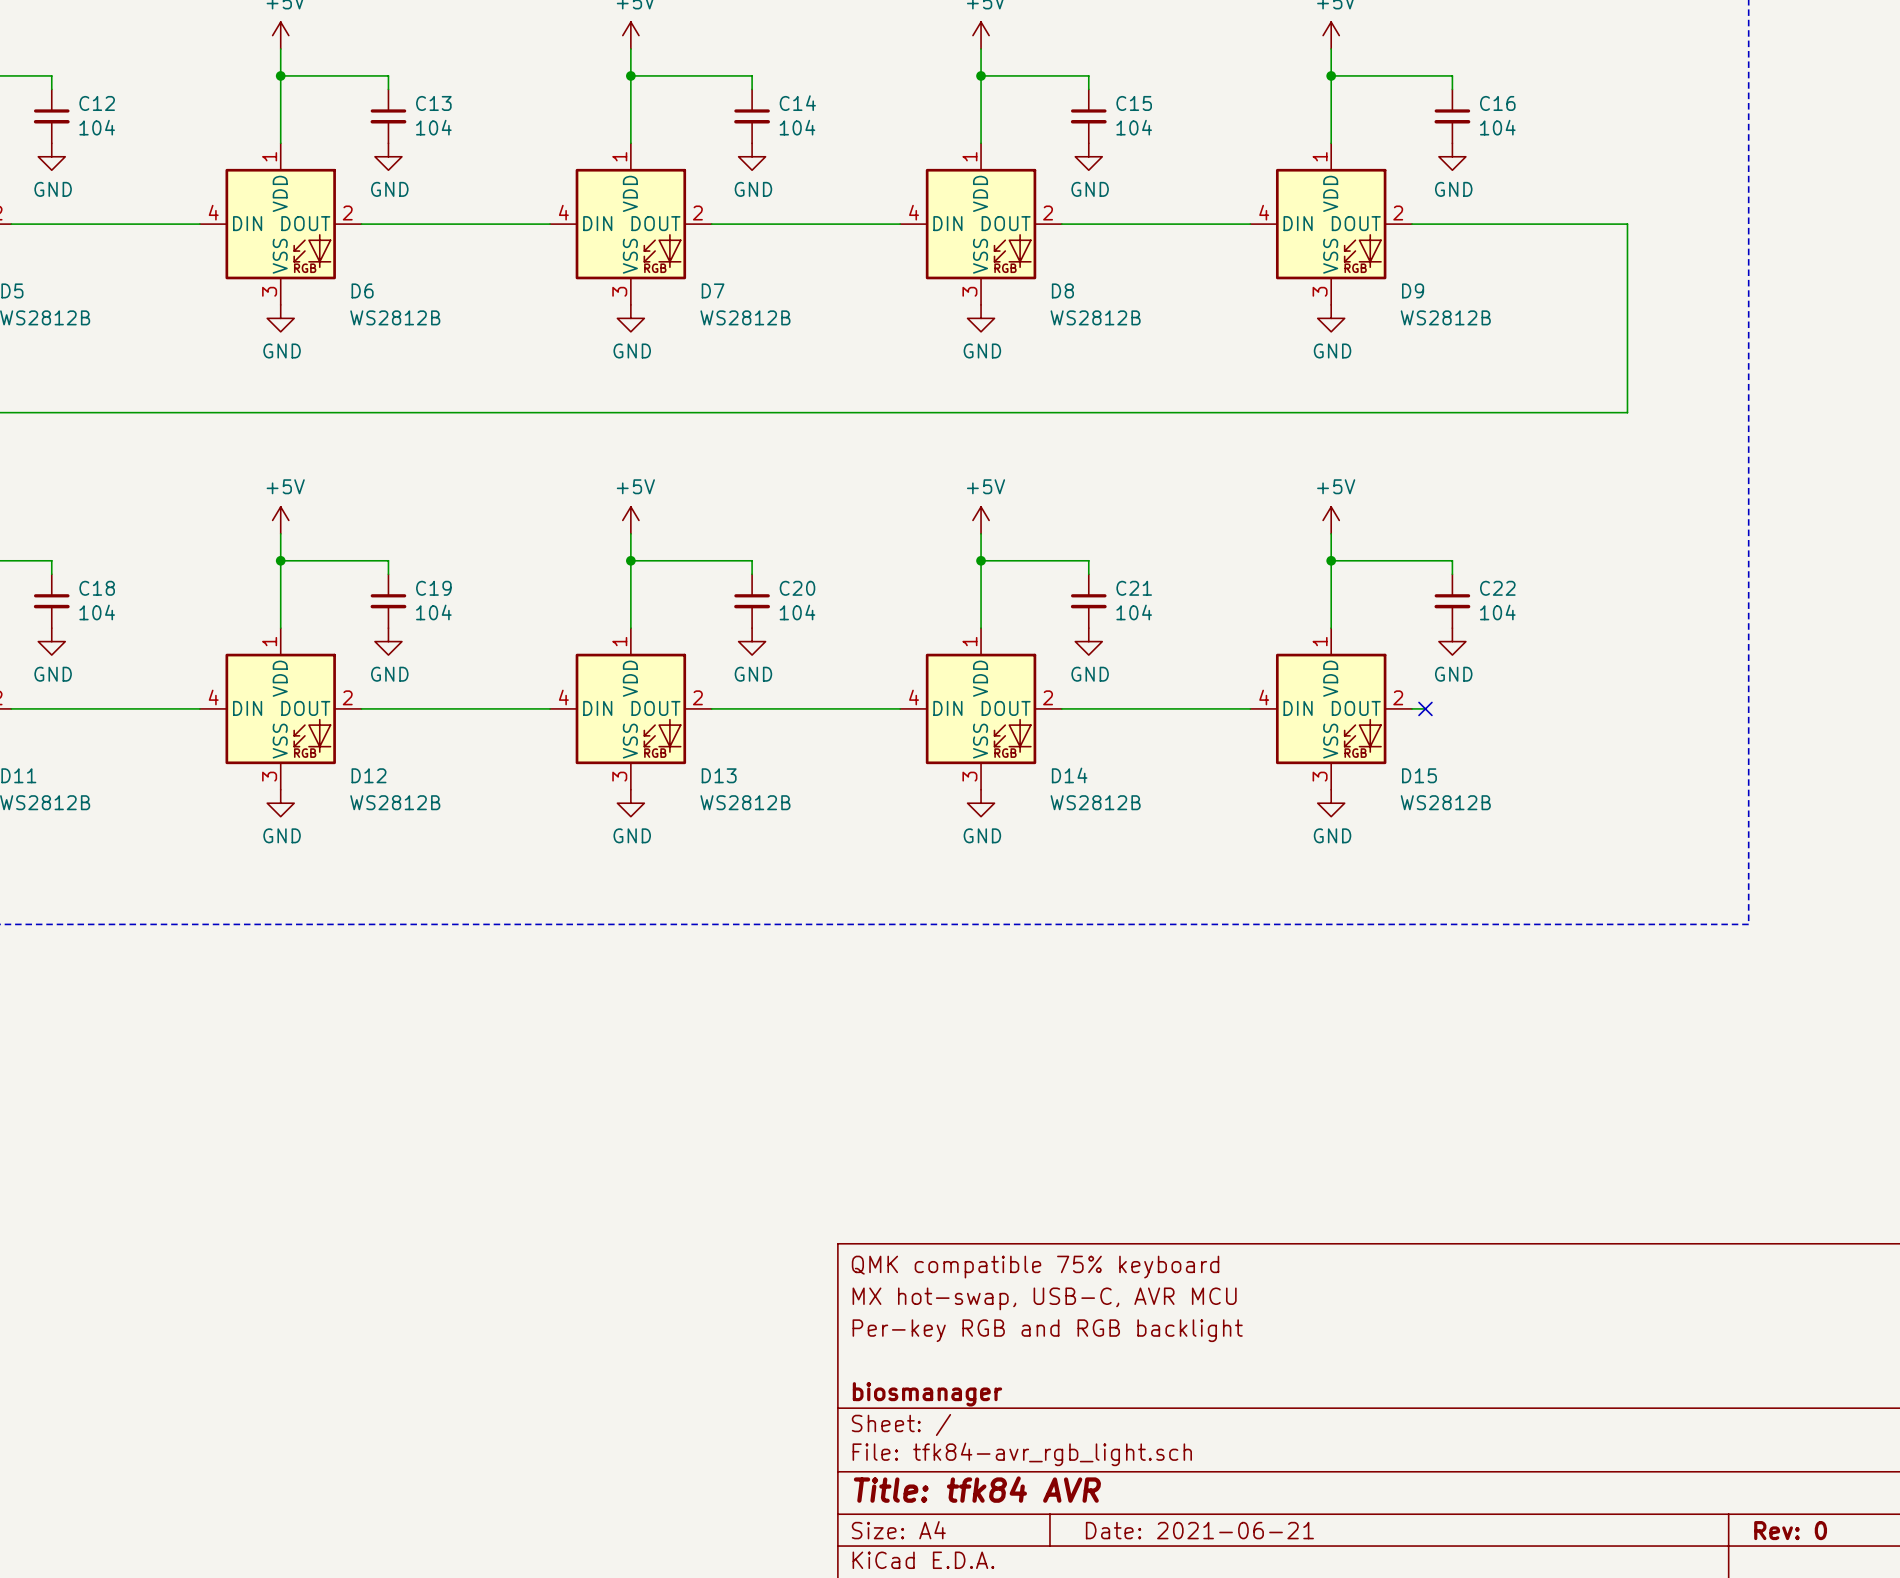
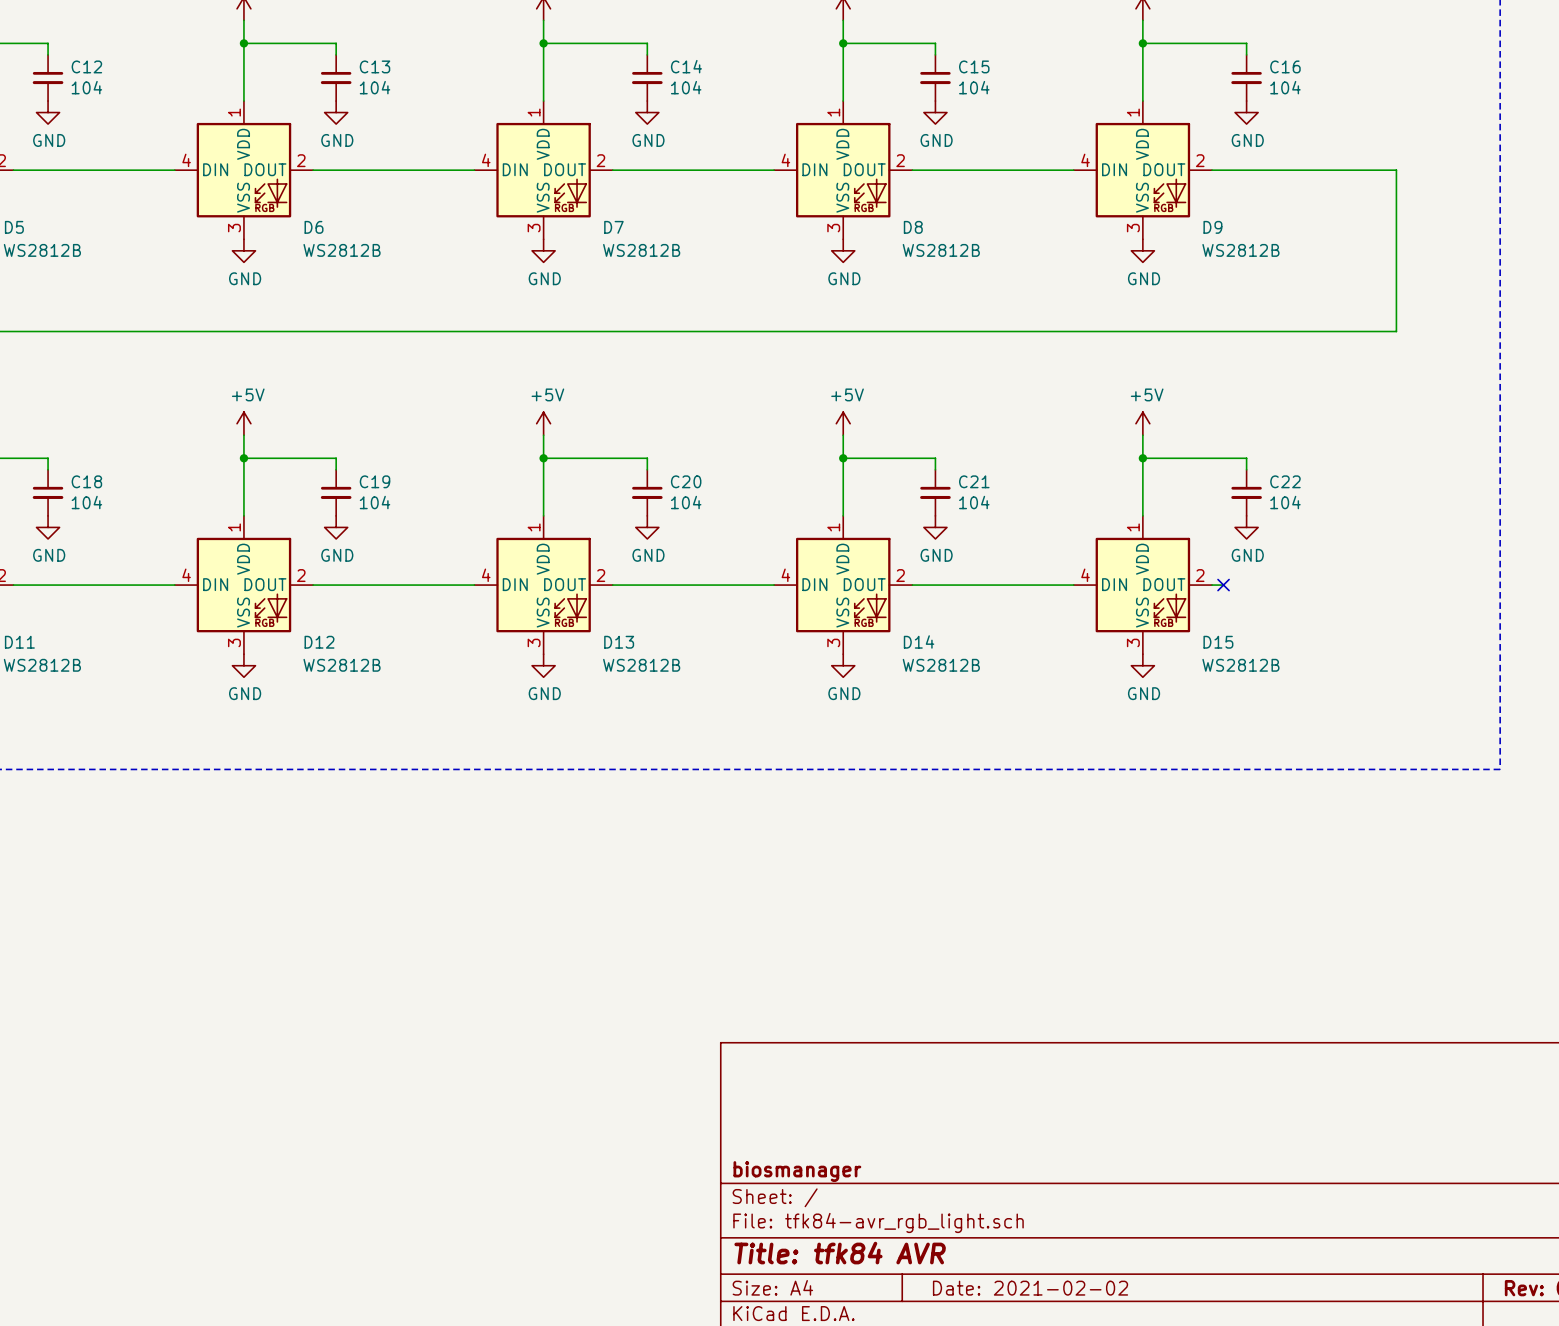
title block: QMK compatible 75% keyboard (1035, 1267) -> none
title block: MX hot-swap, USB-C, AVR MCU (1044, 1298) -> none
title block: Per-key RGB and RGB backlight (1047, 1330) -> none
title block: Date: 2021-06-21 (1199, 1530) -> Date: 2021-02-02 (1030, 1288)

